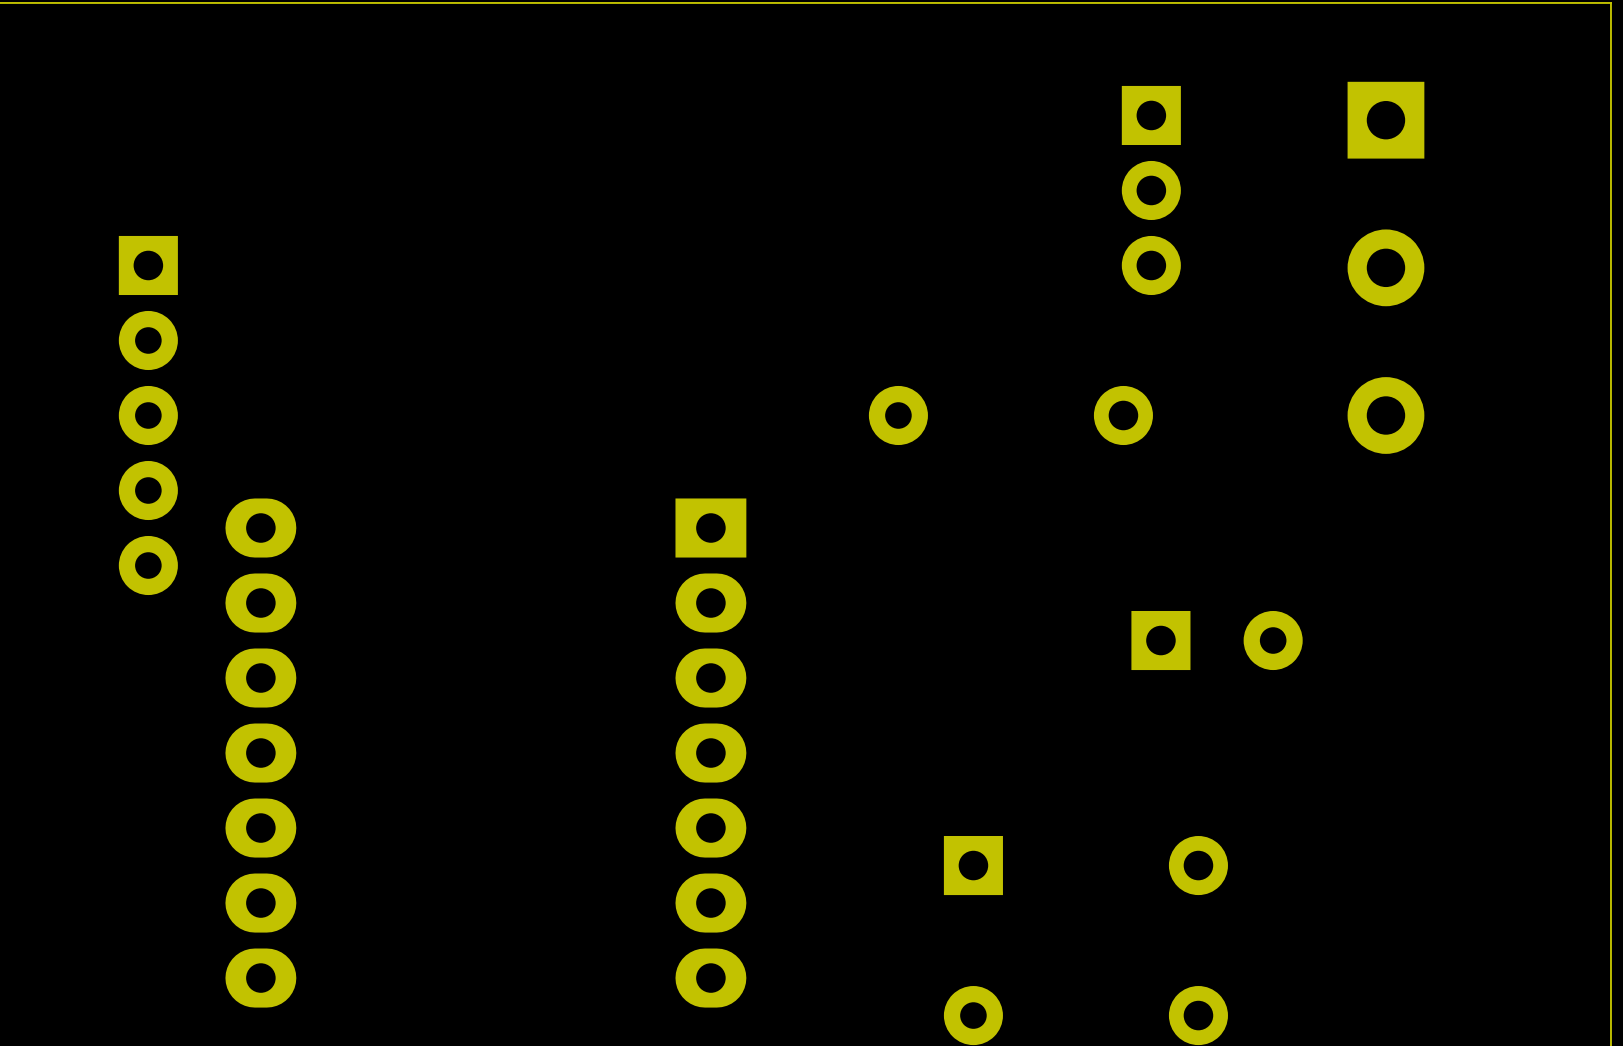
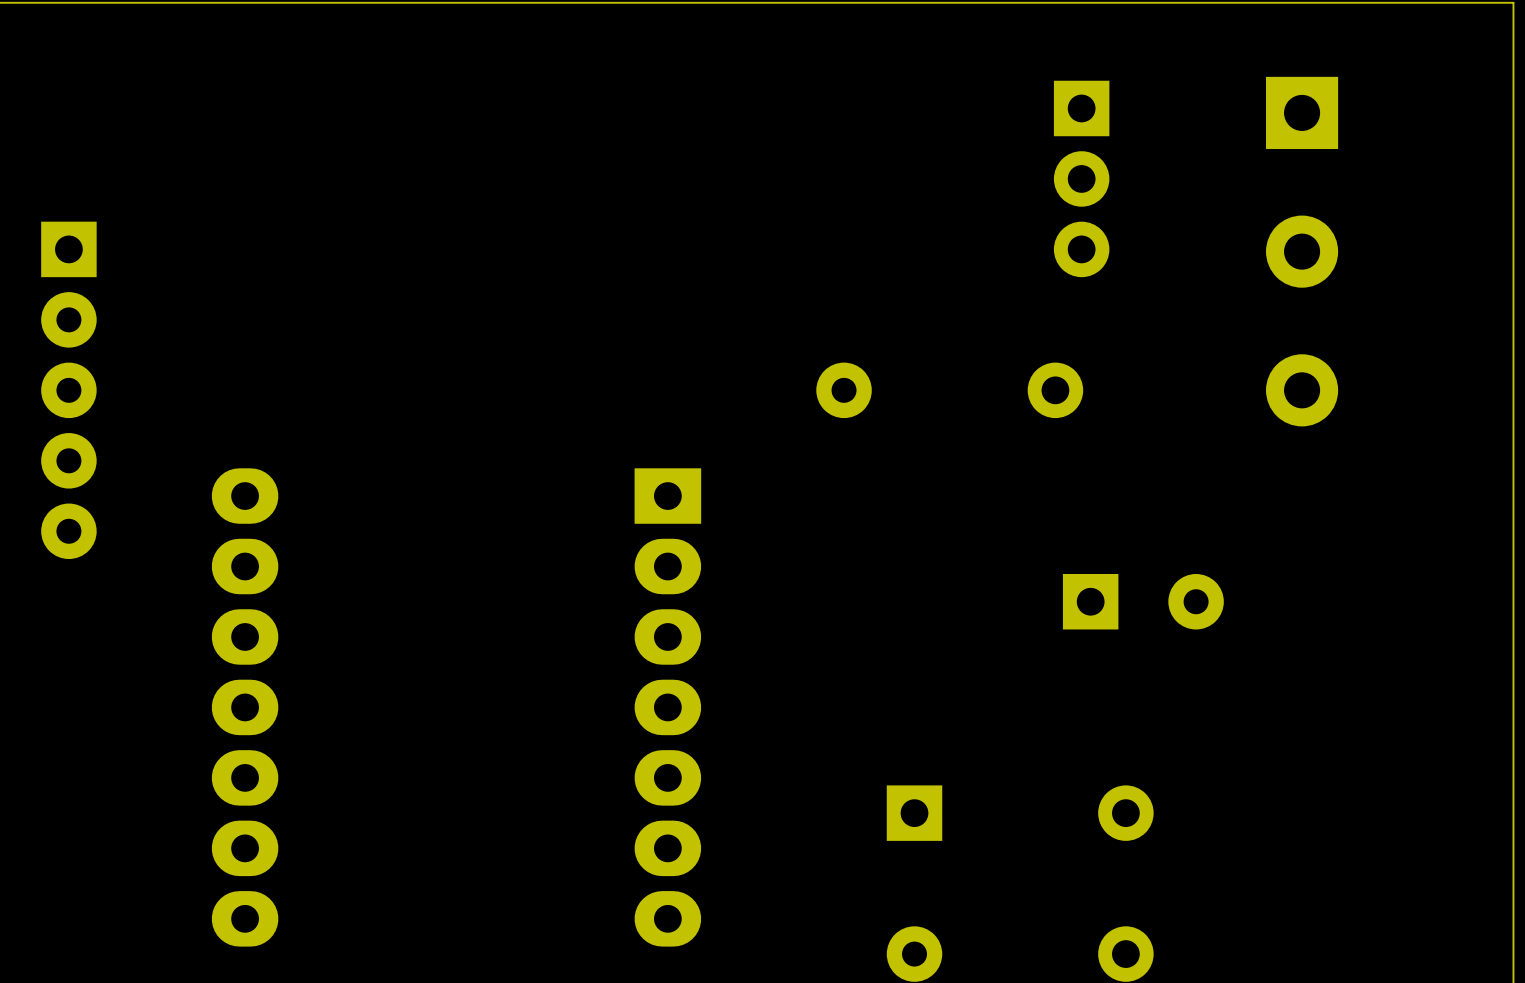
part position: (148, 415) -> (68, 390)

